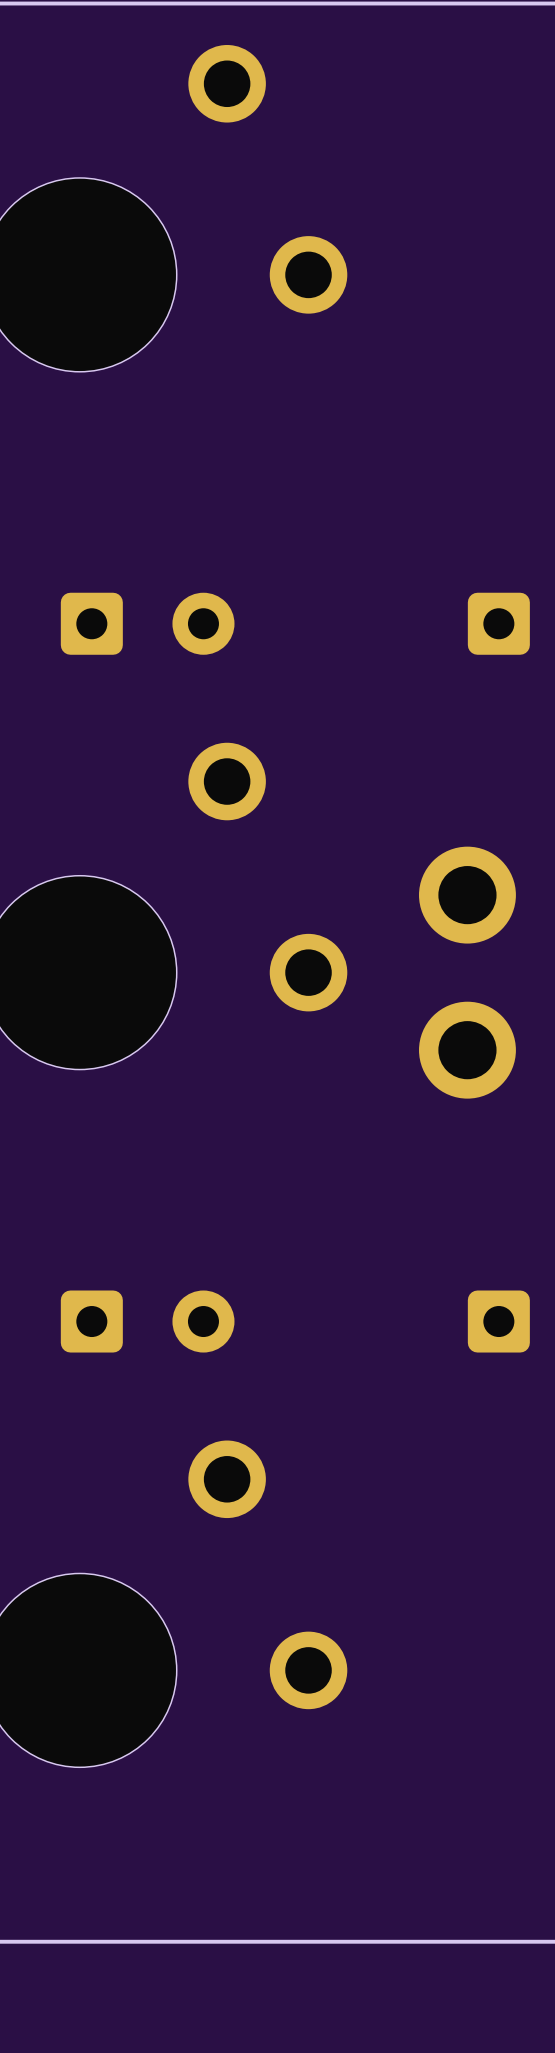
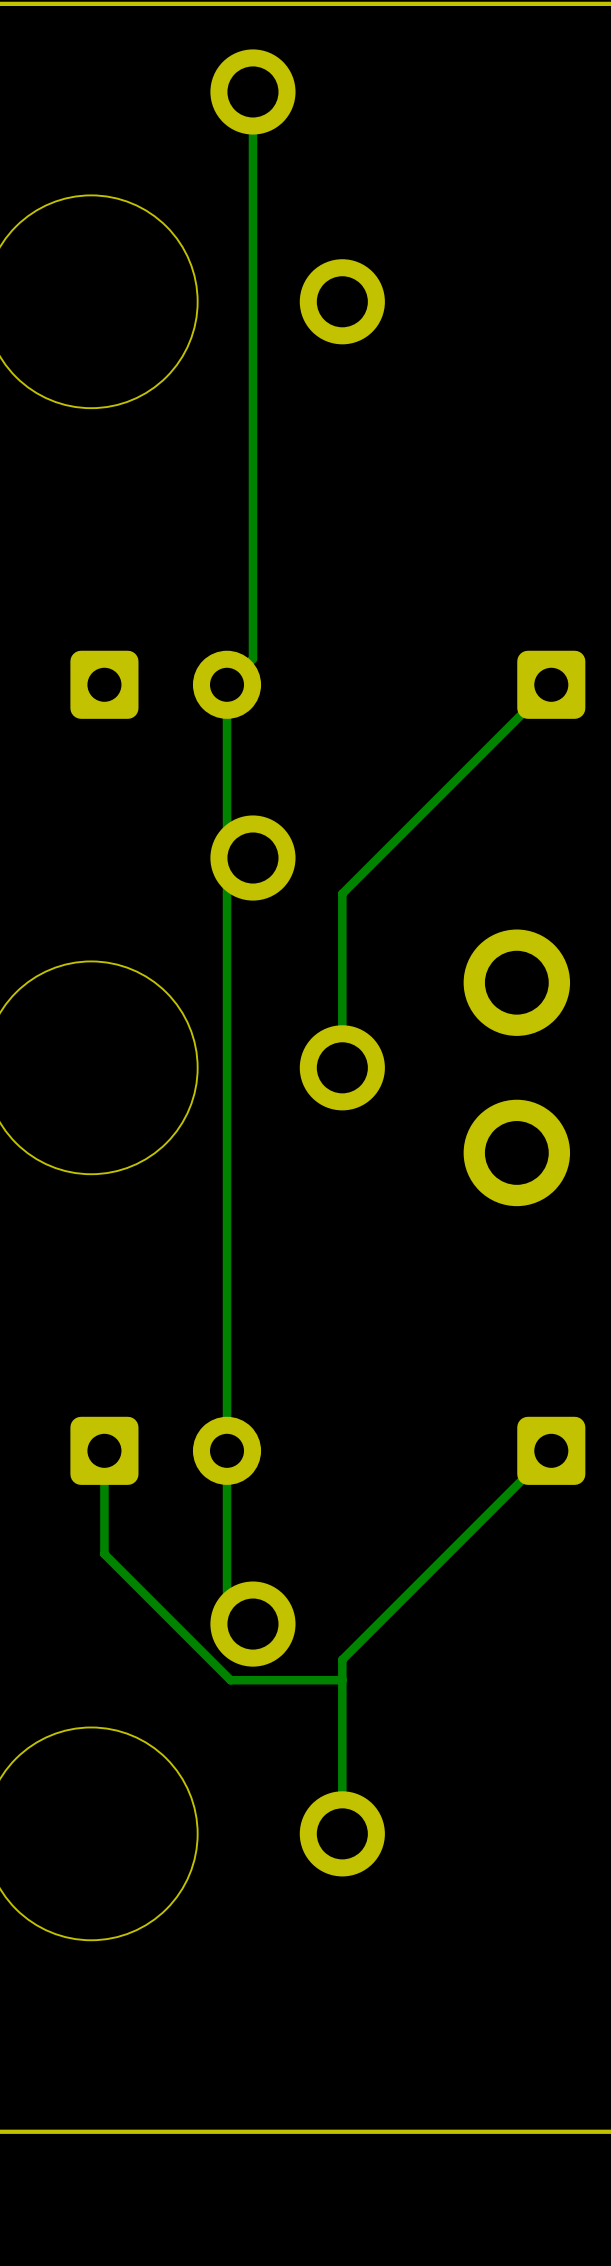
track: none -> (252, 91) (252, 658) (227, 684) (227, 832) (252, 858) (227, 883) (227, 1598) (252, 1624)
track: none -> (551, 684) (342, 893) (342, 1067)
track: none -> (104, 1450) (104, 1554) (230, 1680) (342, 1680)
track: none -> (551, 1450) (342, 1659) (342, 1833)

